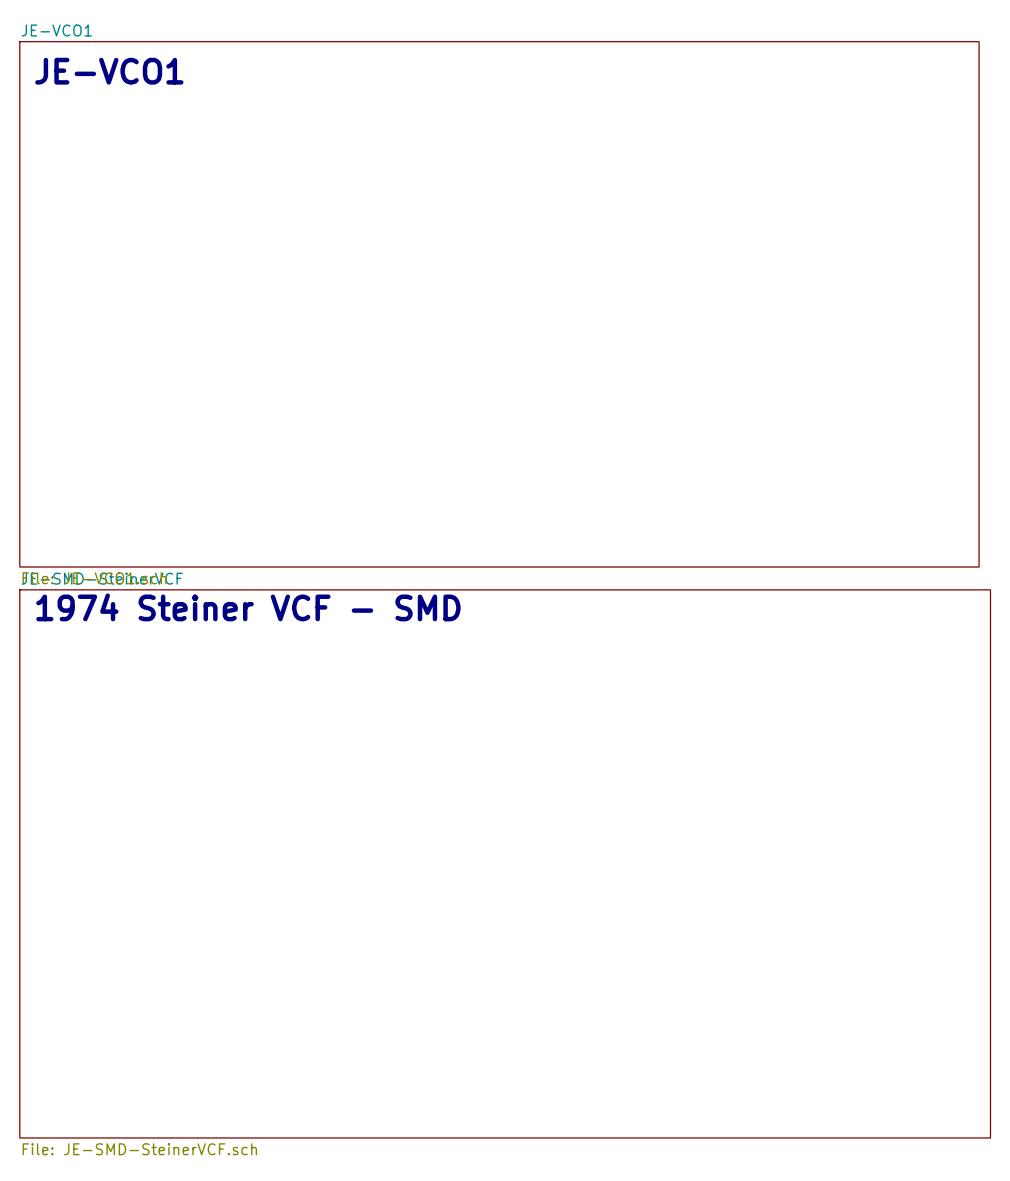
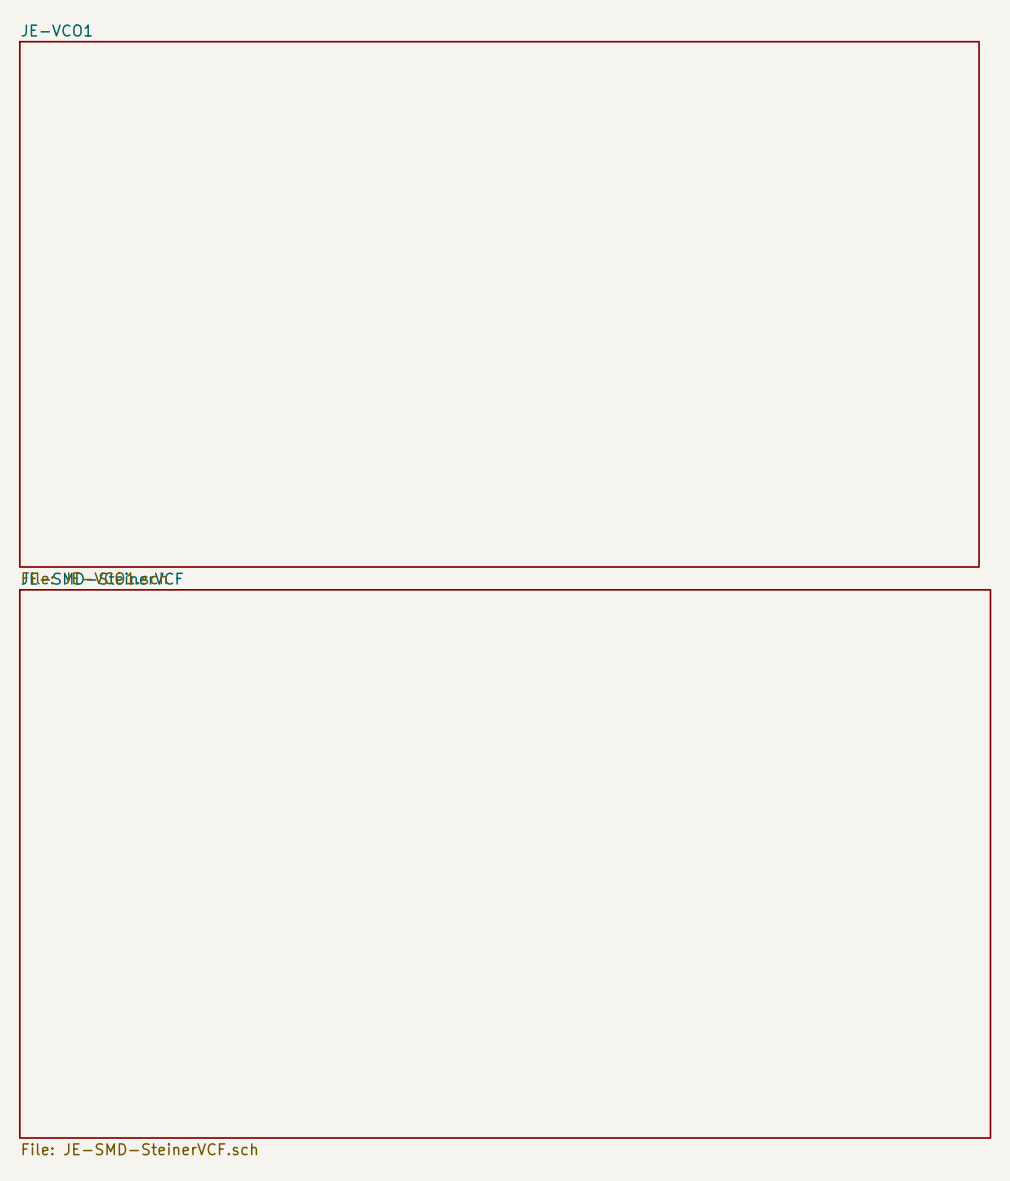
text: JE-VCO1 (109, 71) -> none
text: 1974 Steiner VCF - SMD (248, 607) -> none

